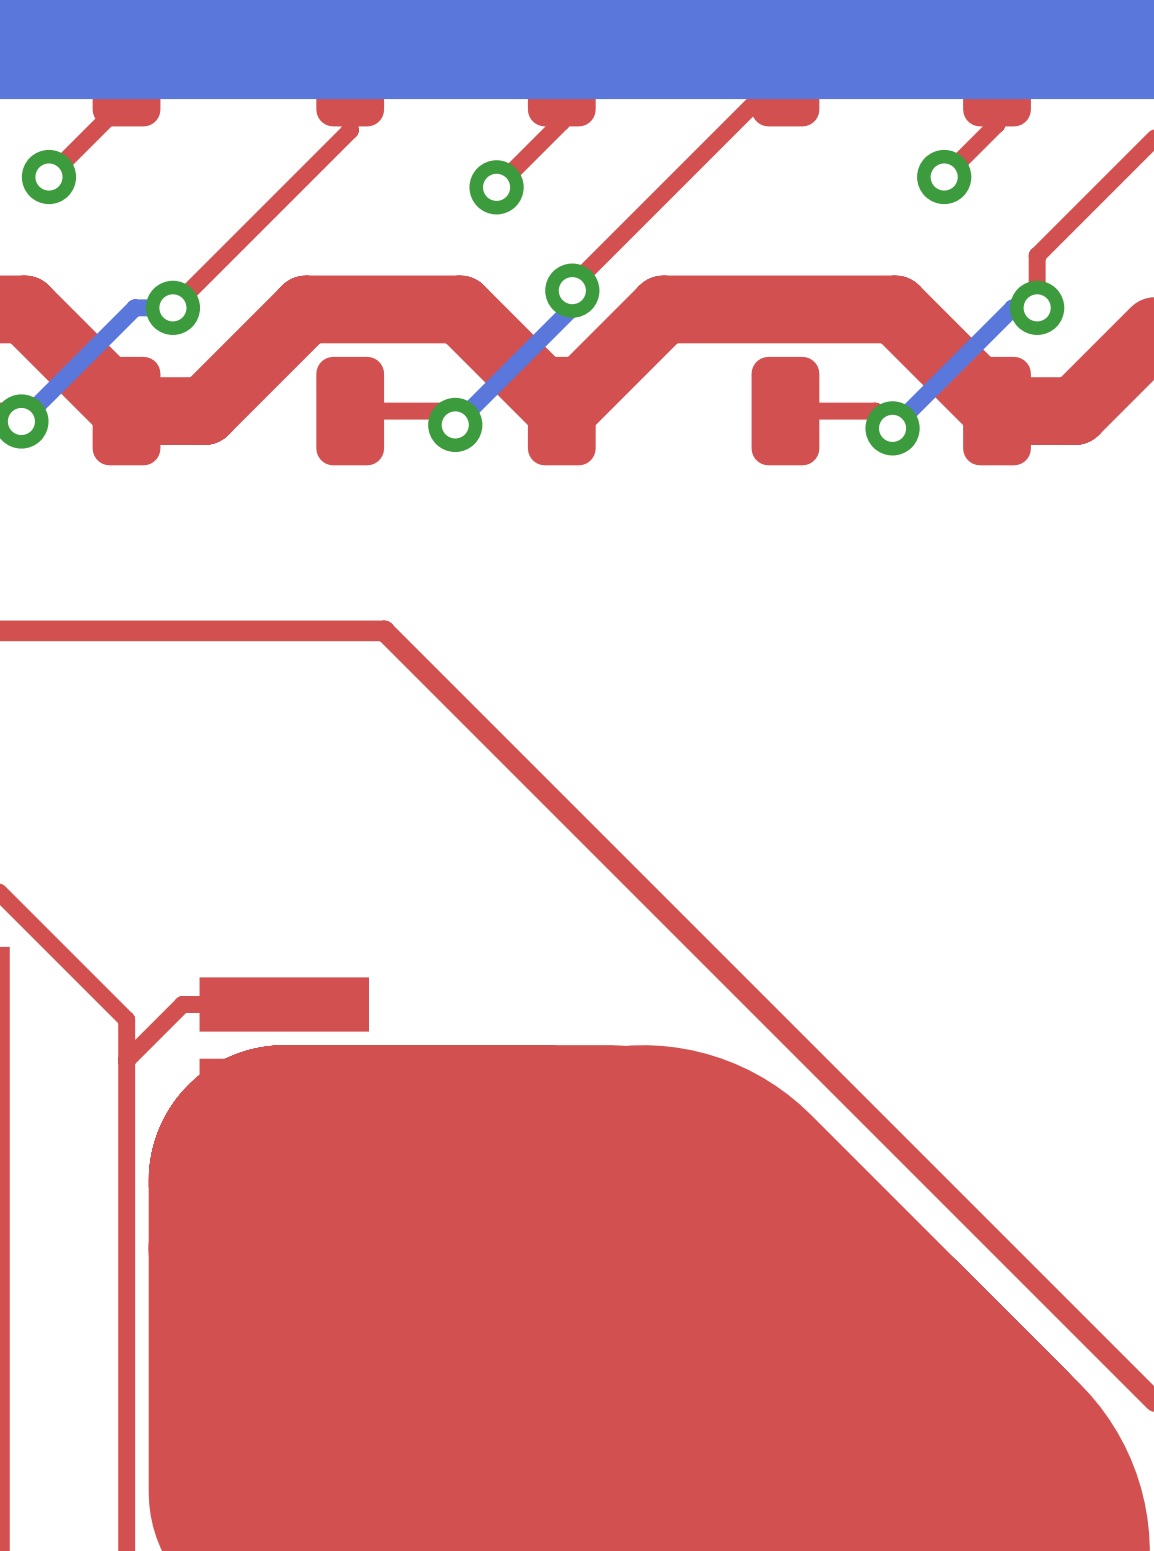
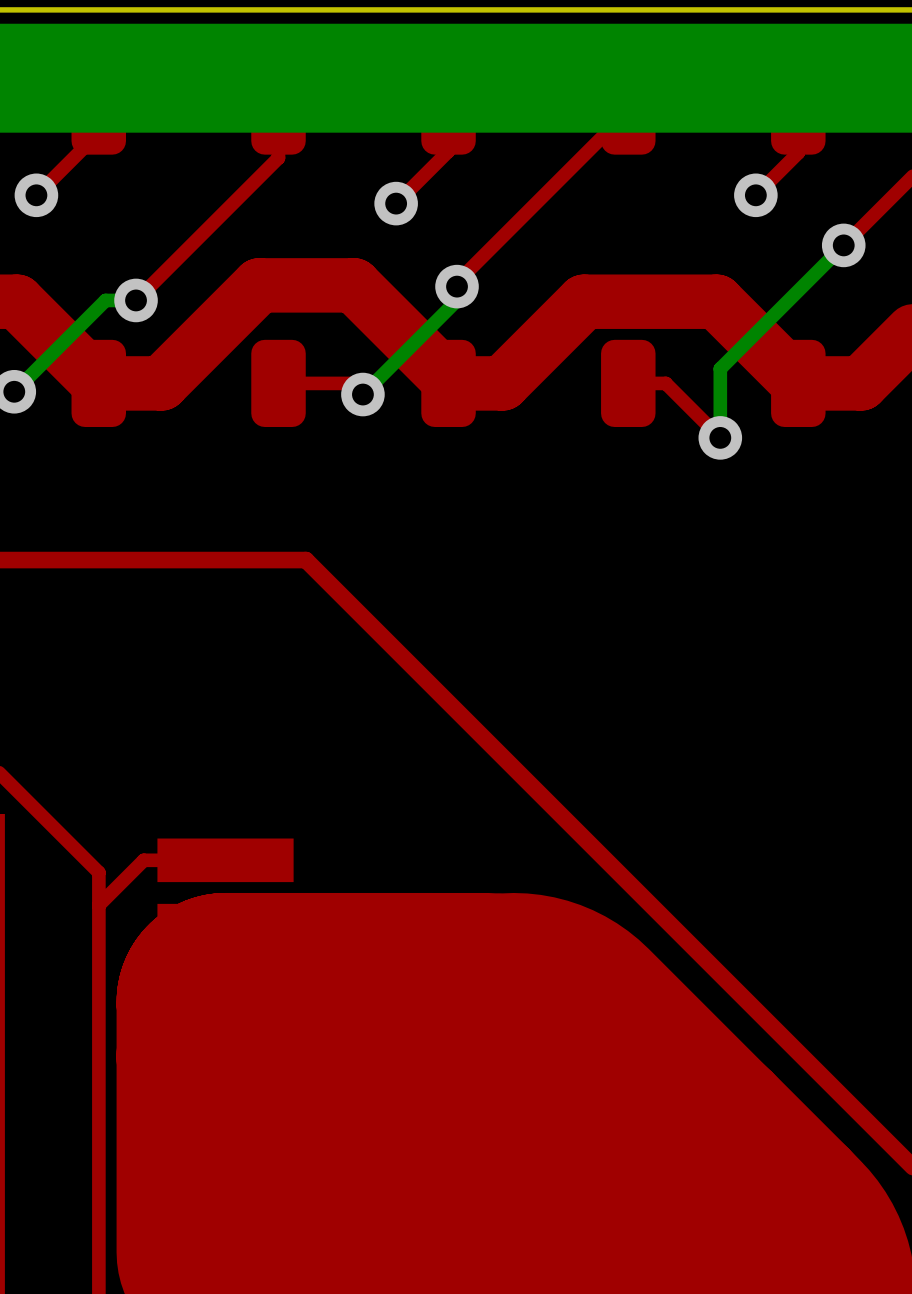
top track: (1053, 239) (1037, 255) (1037, 307) -> none
bottom track: none -> (843, 245) (720, 368) (720, 437)
bottom track: (1037, 307) (1013, 307) (892, 428) -> none
via position: (1037, 307) -> (843, 245)
top track: (730, 309) (663, 309) (561, 411) (460, 309) (306, 309) -> (448, 379) (353, 285) (259, 285) (243, 301)
top track: none -> (584, 301) (502, 383) (448, 383)
top track: (832, 411) (875, 411) (892, 428) -> (665, 383) (720, 437)
via position: (892, 428) -> (720, 437)

